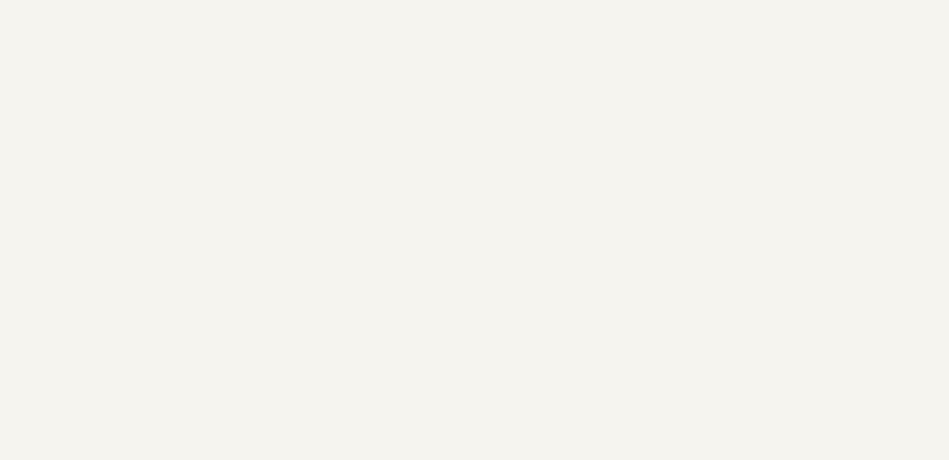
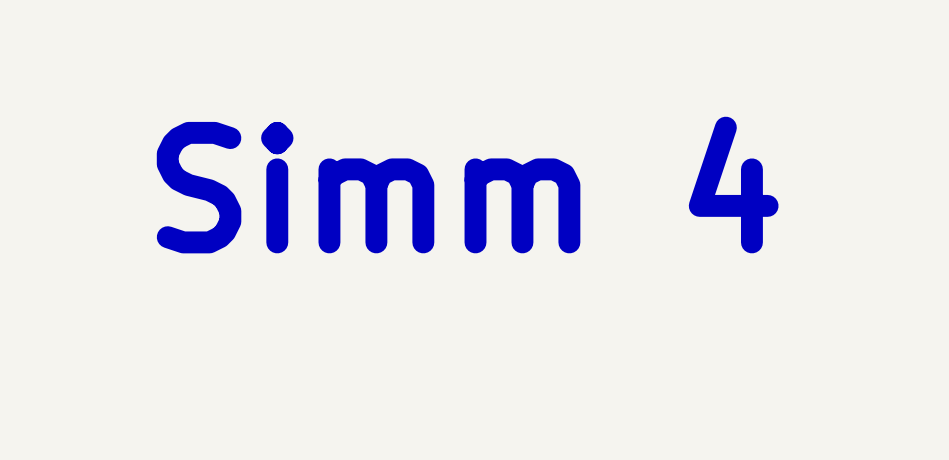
text: none -> Simm 4 (467, 185)

